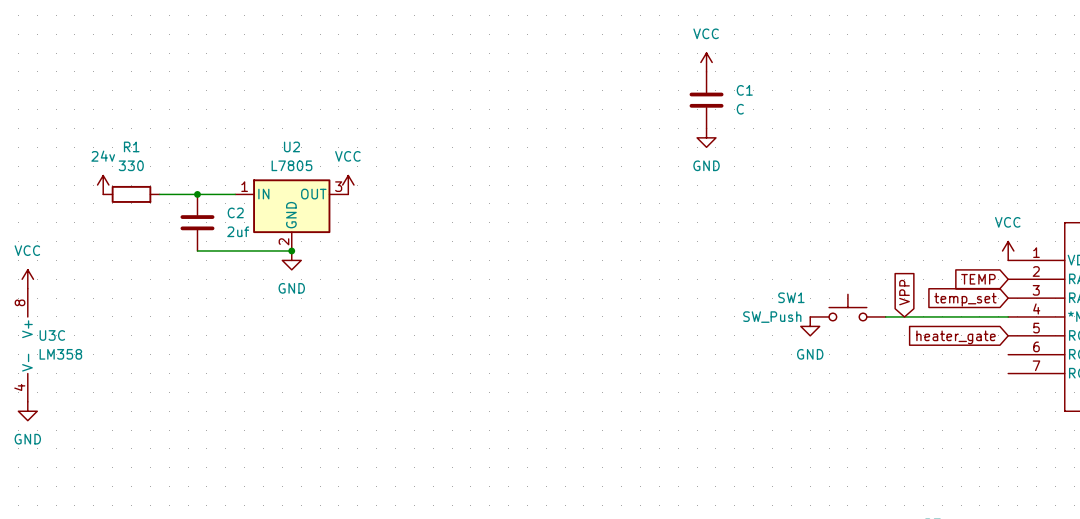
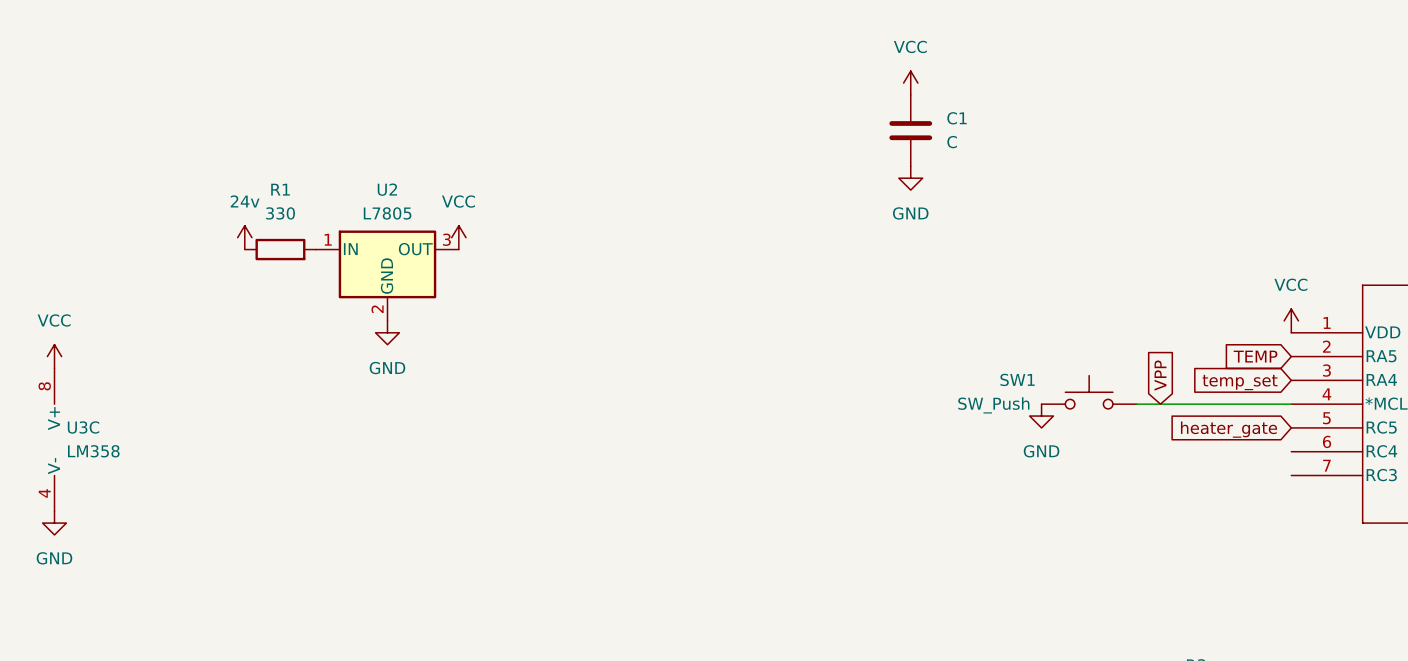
power symbol position: 24v (103, 185) -> 24v (244, 237)
R1 position: (131, 194) -> (280, 249)
wire: (159, 194) (235, 194) -> none
junction: (197, 194) -> none
C2: 2uf (197, 222) -> none
wire: (197, 250) (291, 250) -> none
junction: (291, 250) -> none

